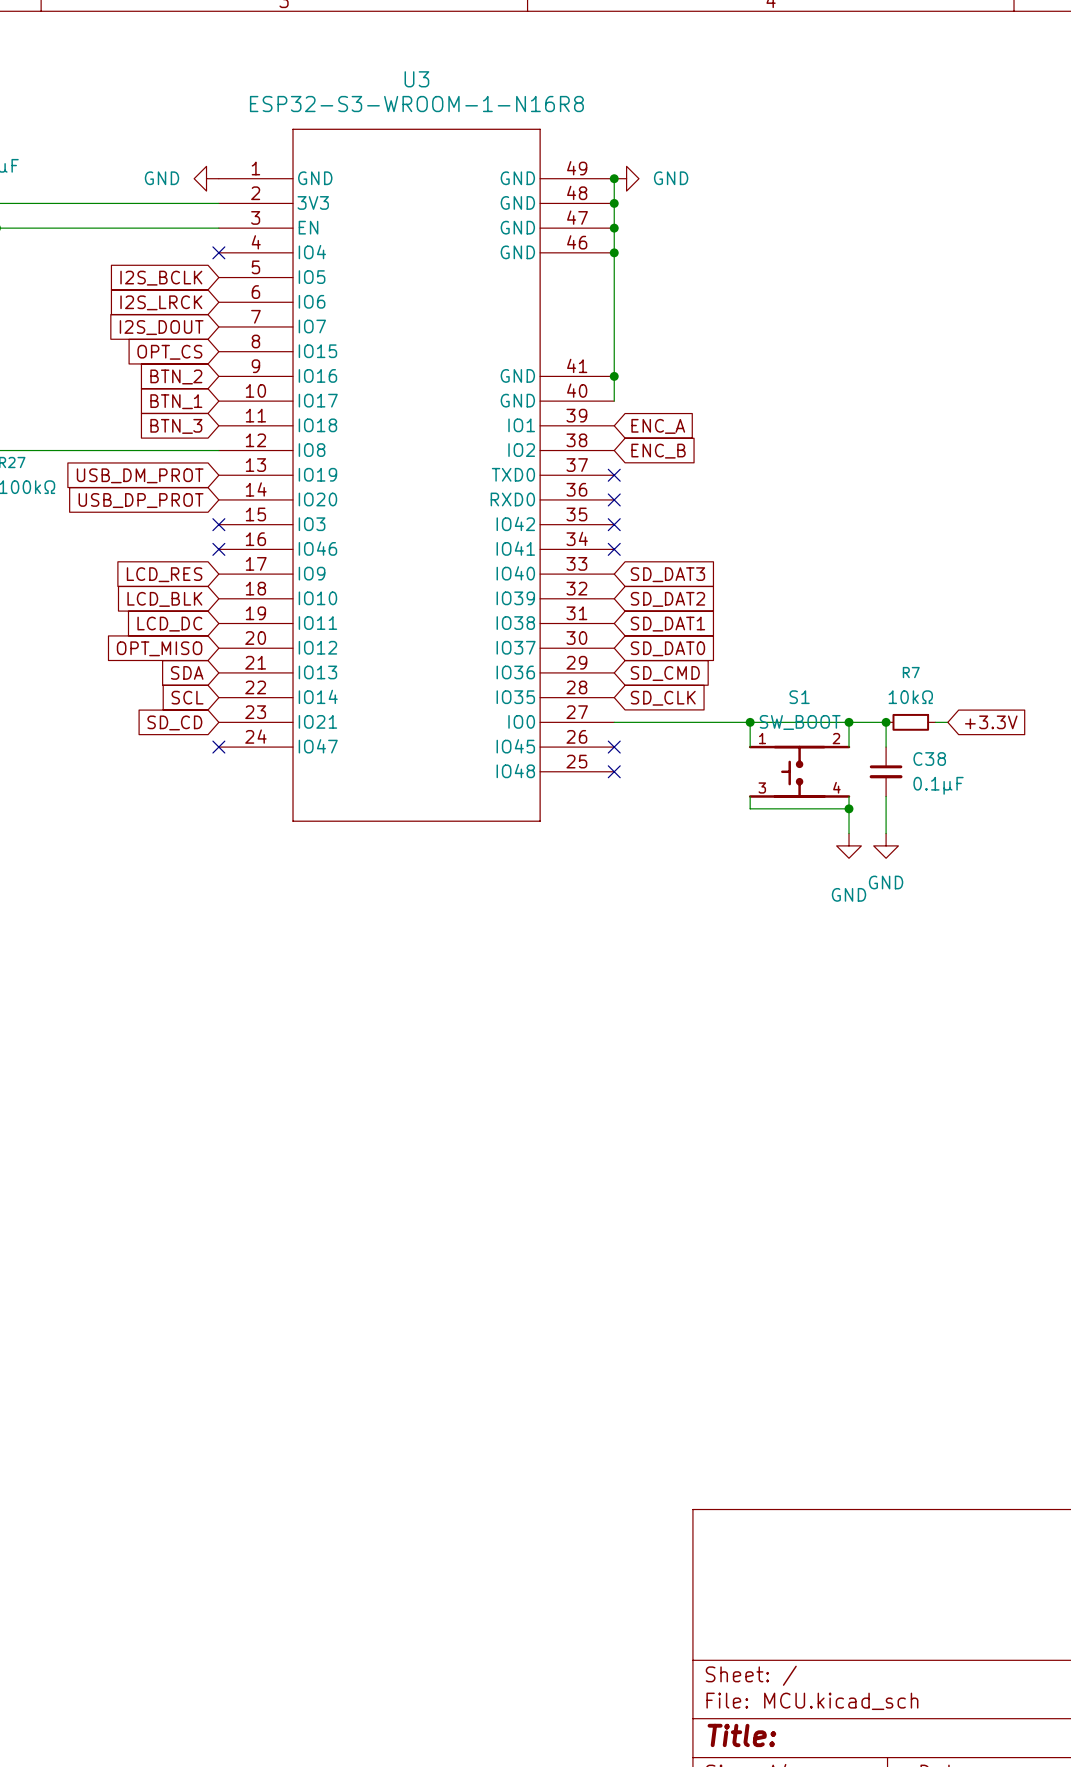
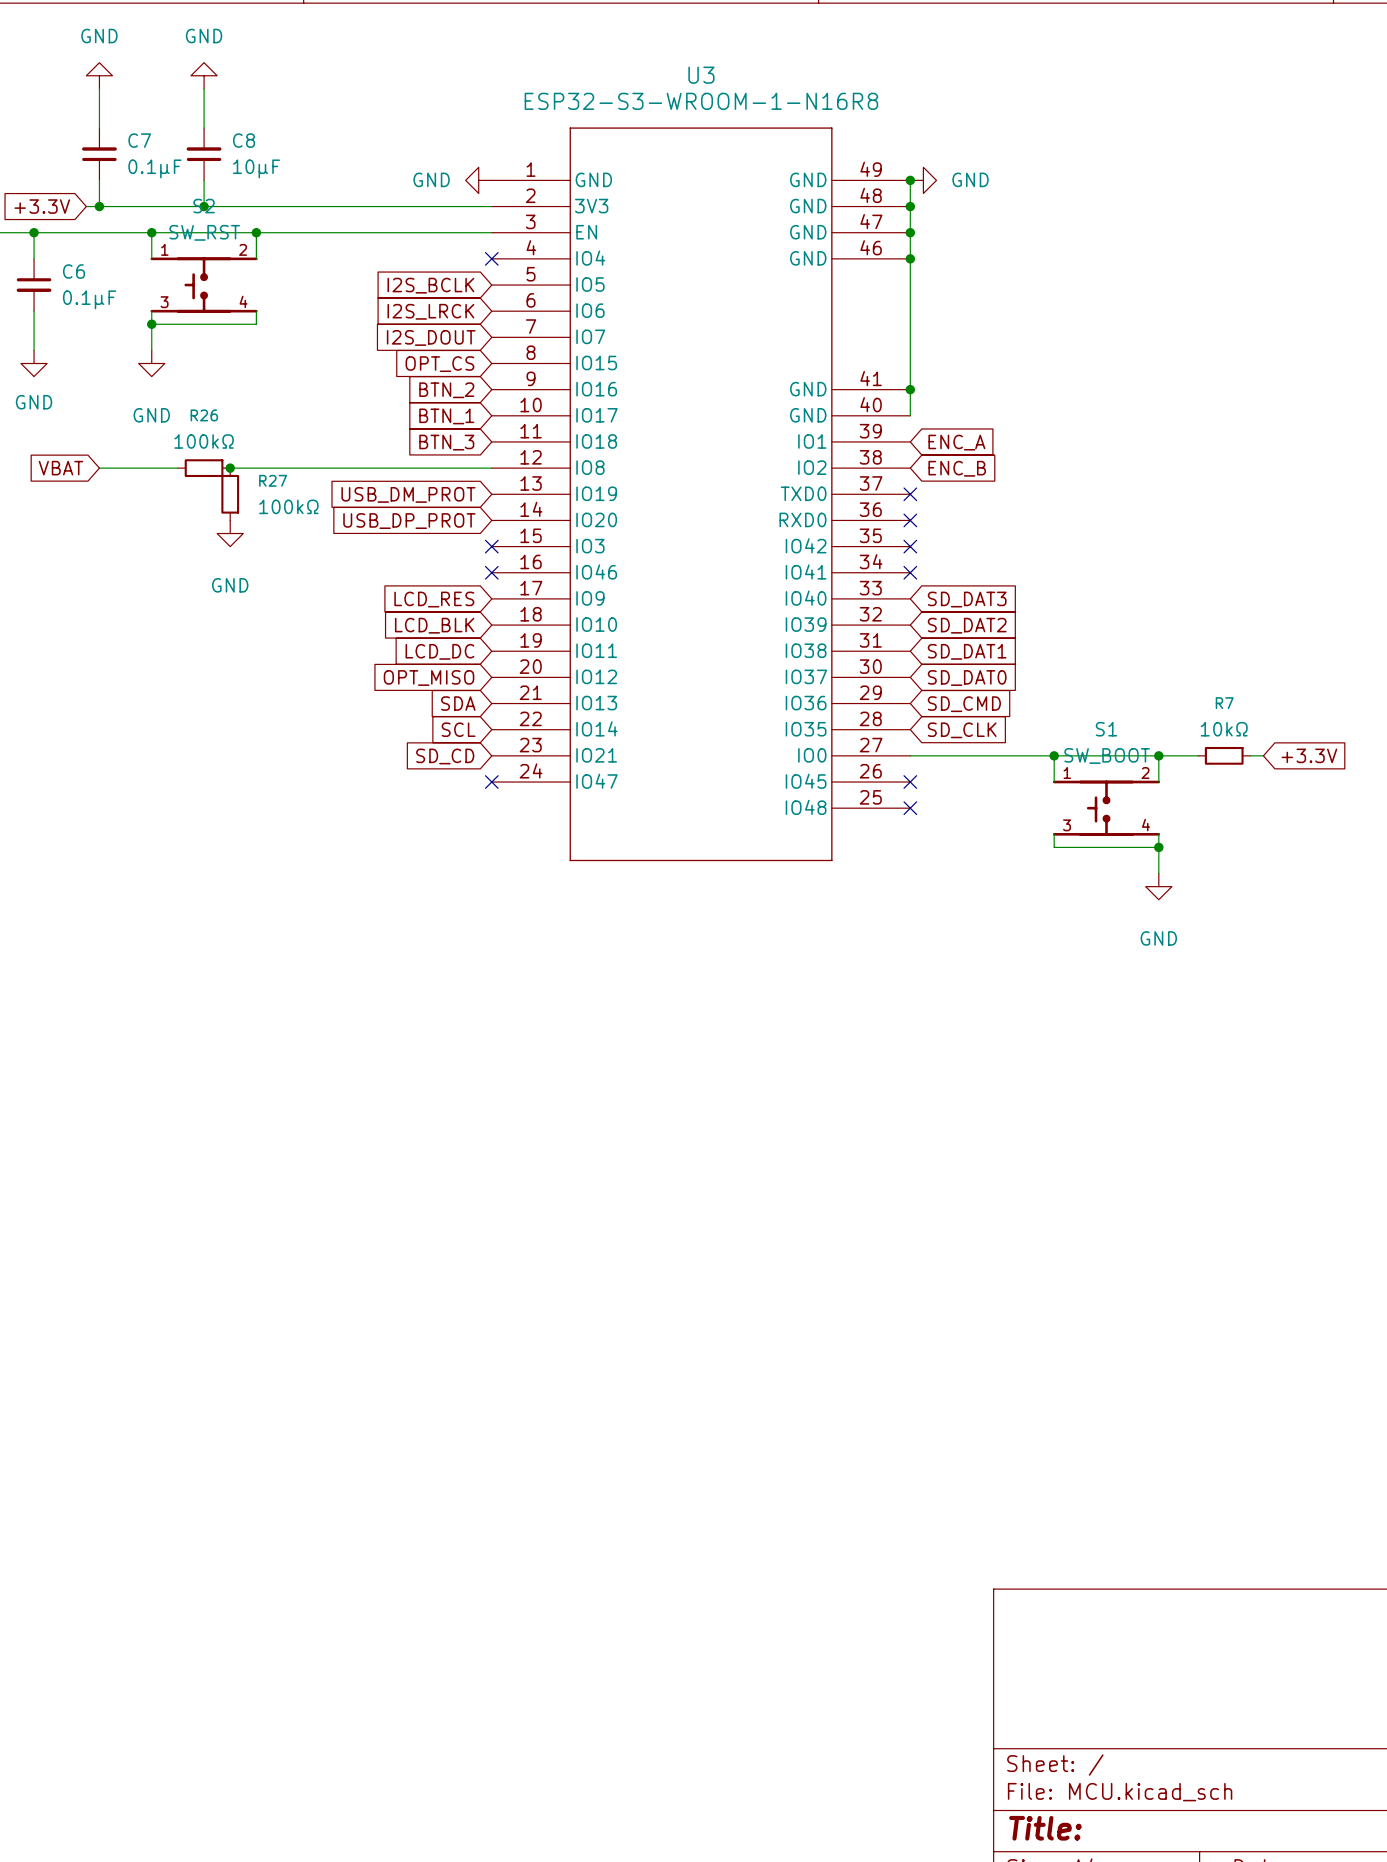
wire: (886, 722) (886, 747) -> none
junction: (886, 722) -> none
C38: 0.1μF (886, 771) -> none
wire: (886, 796) (886, 833) -> none
power symbol: GND (886, 845) -> none

